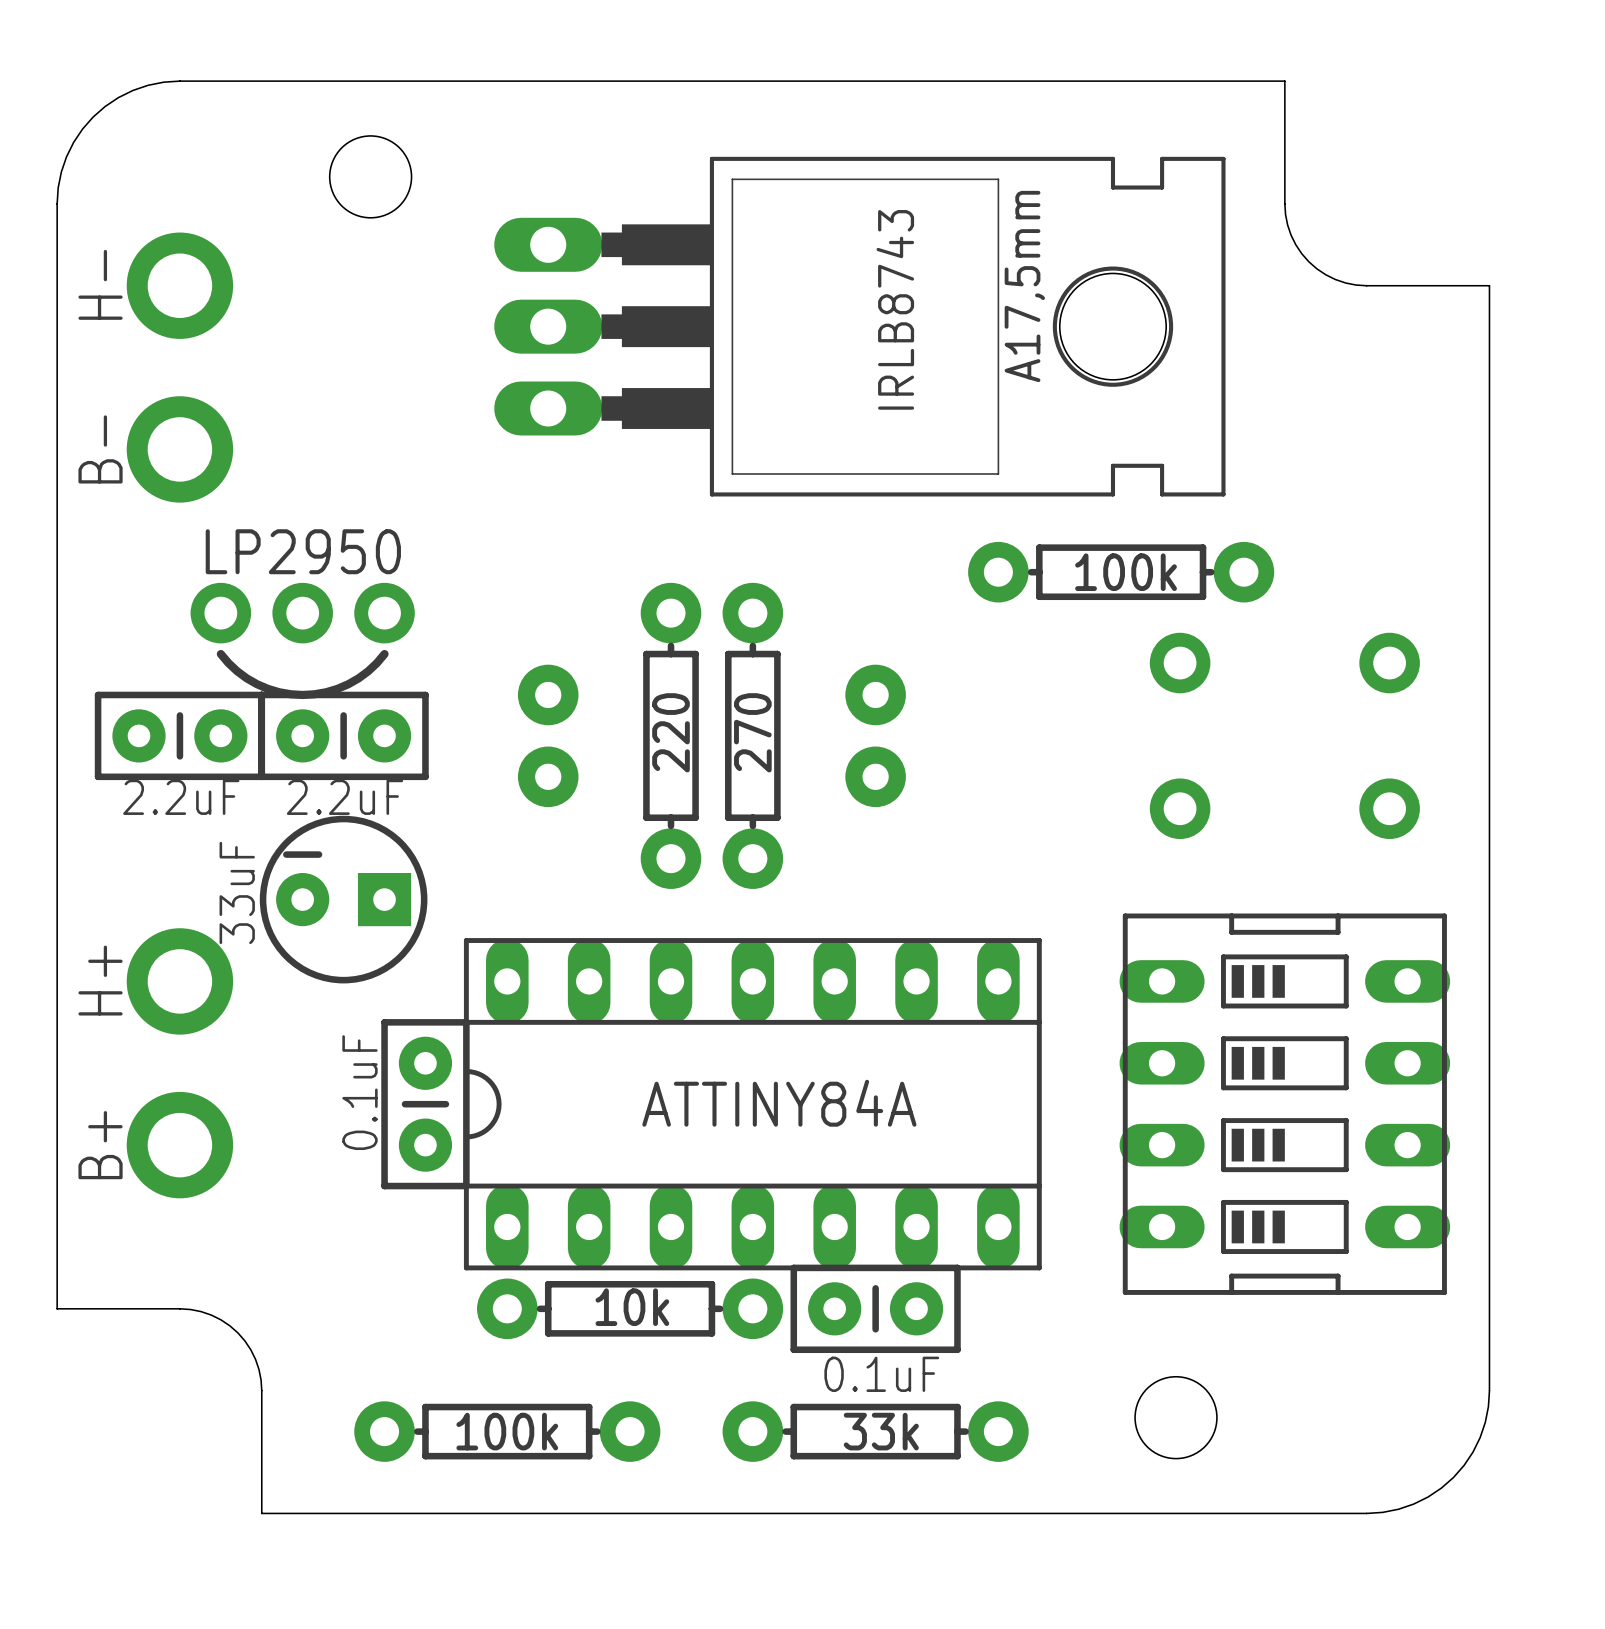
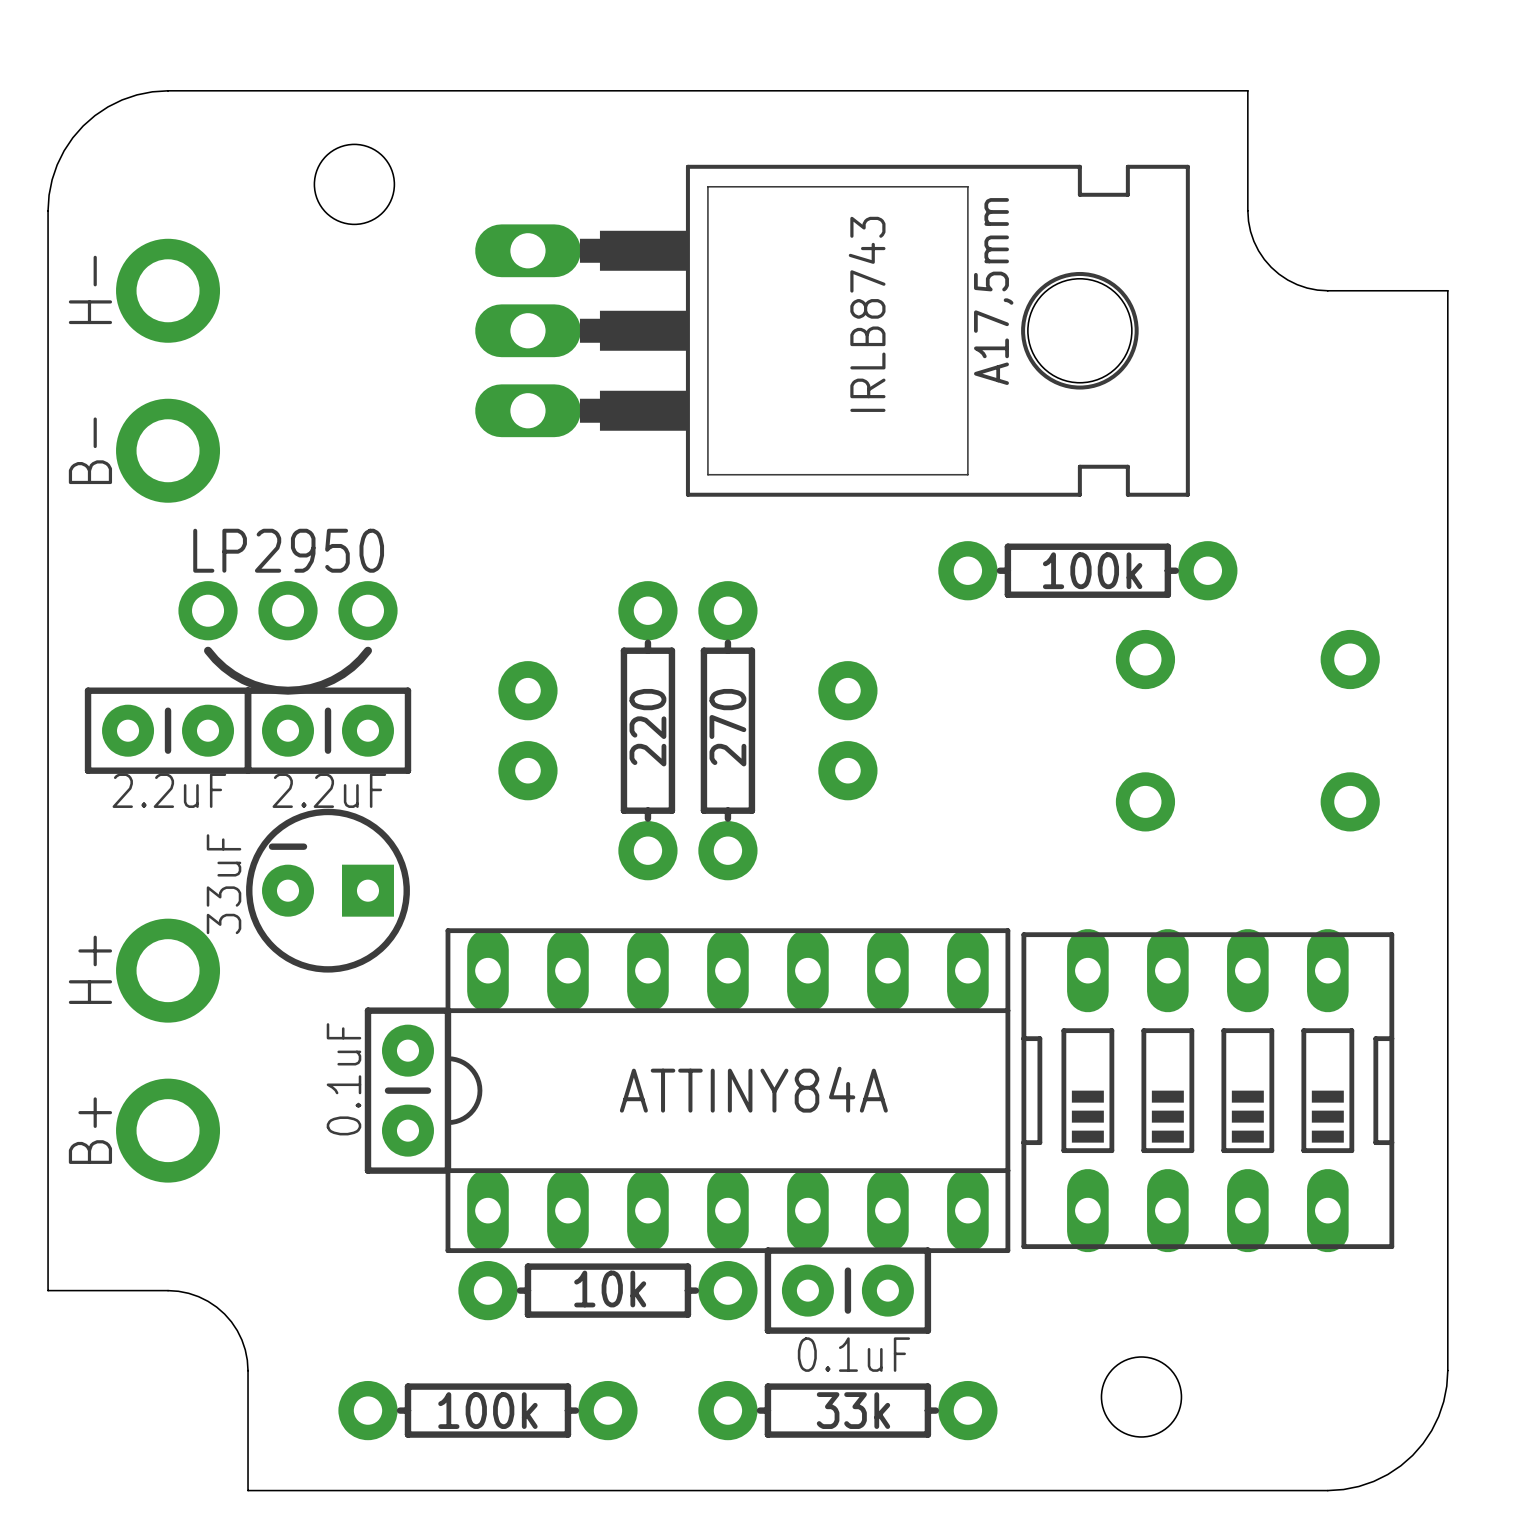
part rotation: 0° (1284, 1104) -> 90° counterclockwise (1207, 1090)

